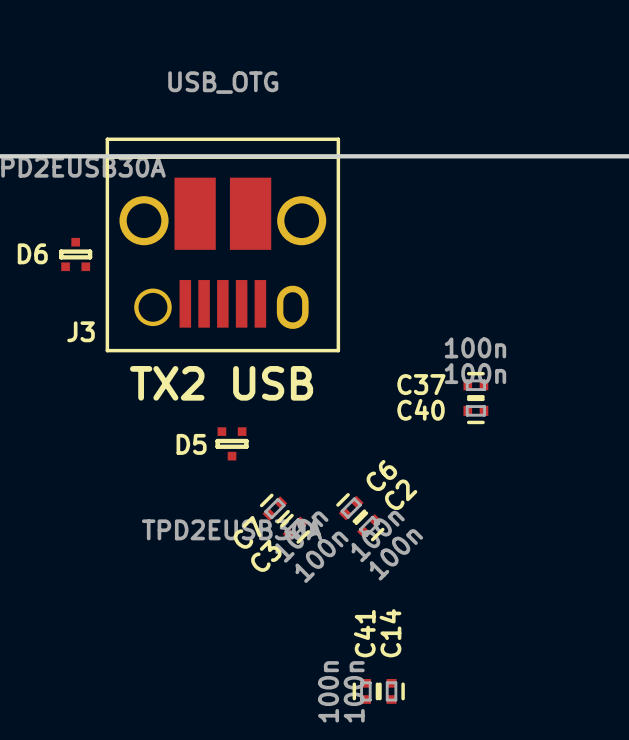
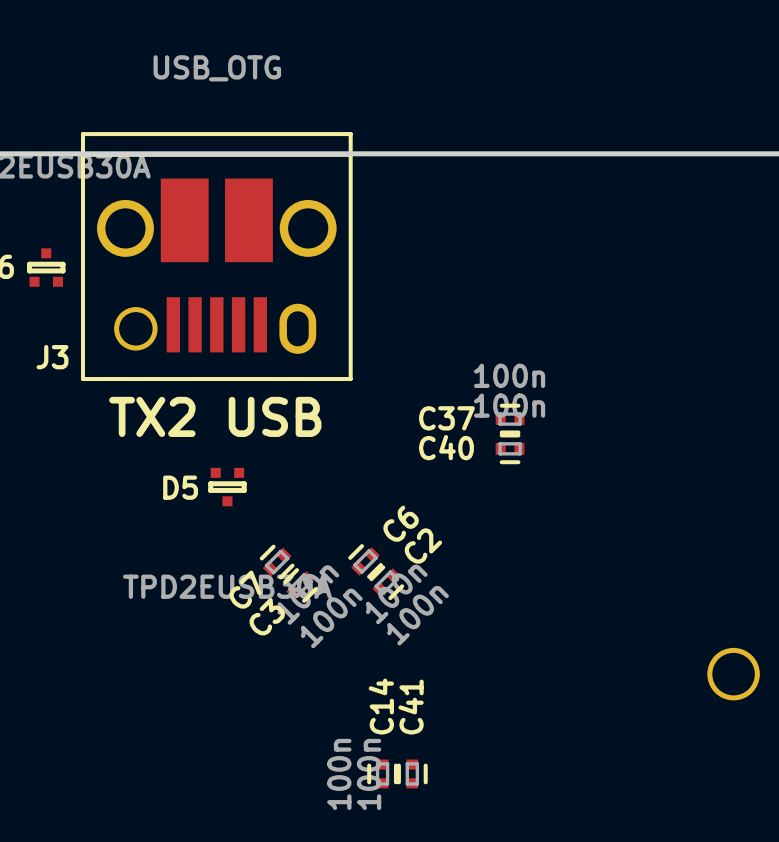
C41 name: C41 (364, 633) -> C14 (381, 706)
C14 name: C14 (390, 633) -> C41 (411, 707)

